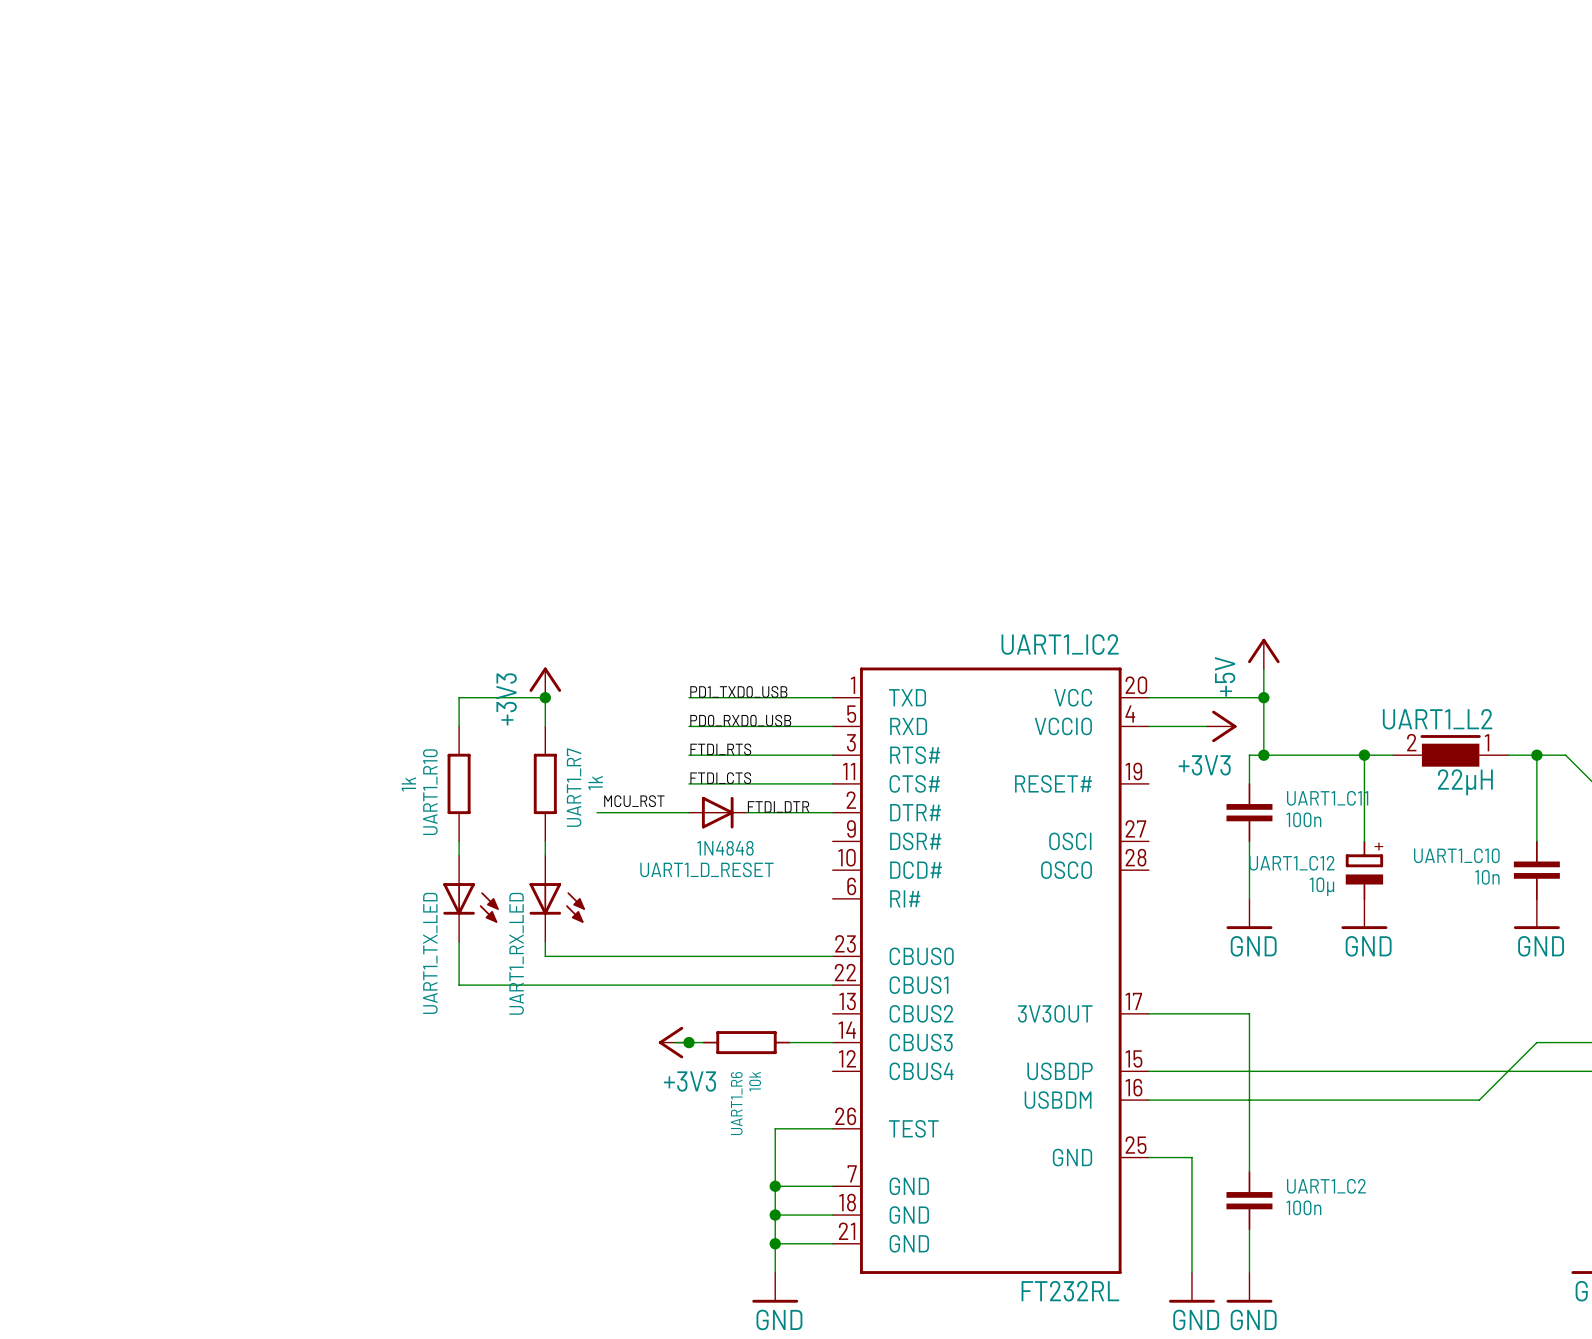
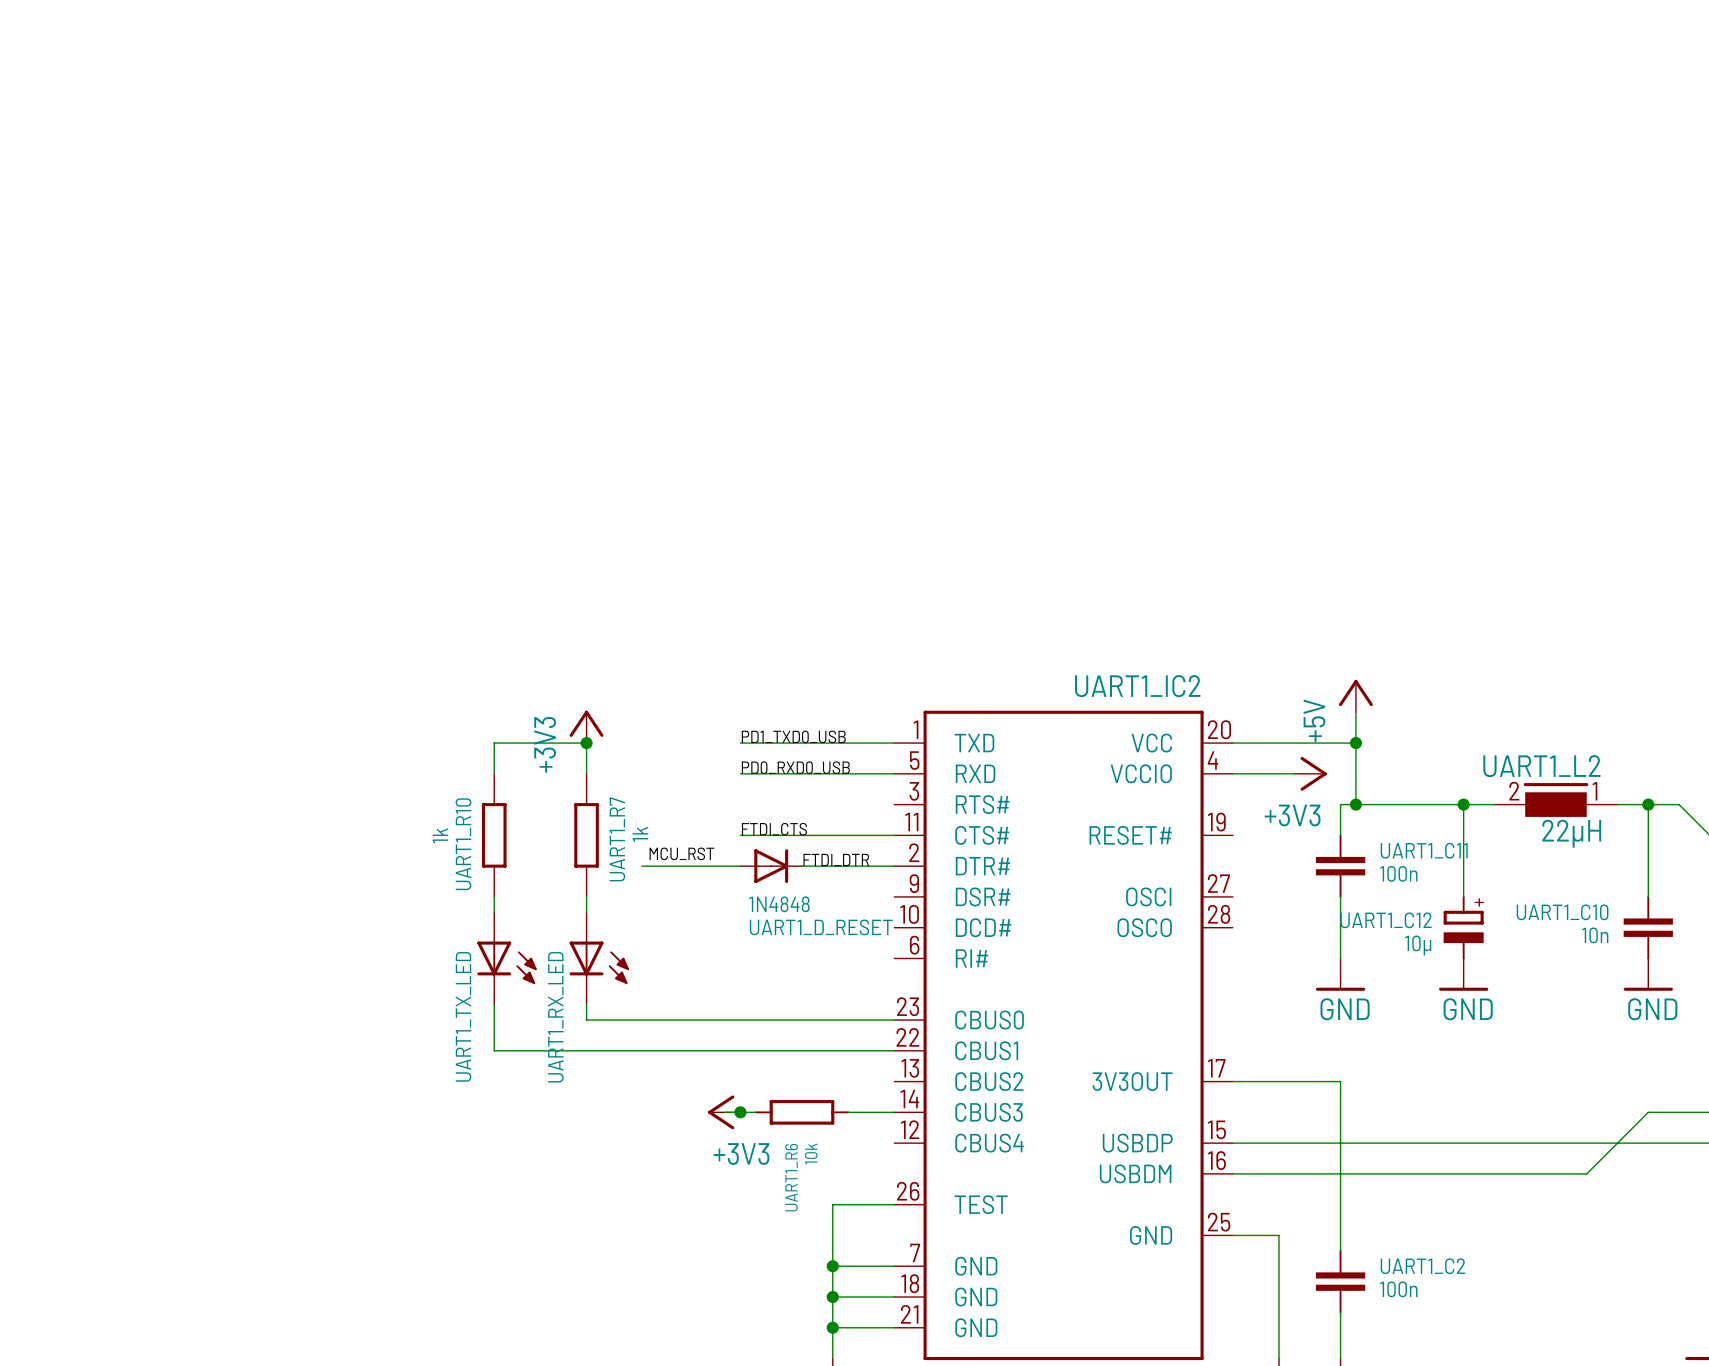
label: FTDI_RTS (720, 749) -> none
wire: (689, 755) (832, 755) -> none
UART1_D_RESET name position: UART1_D_RESET (706, 869) -> UART1_D_RESET (821, 927)

